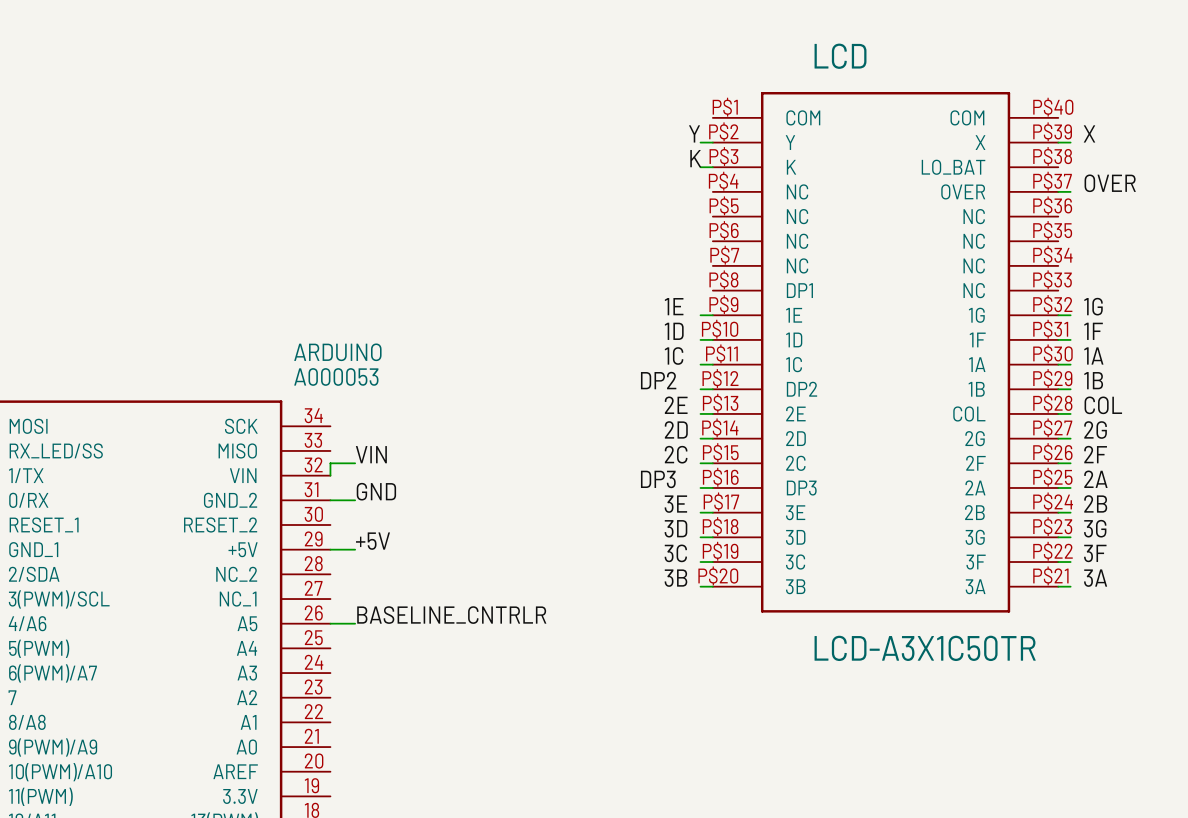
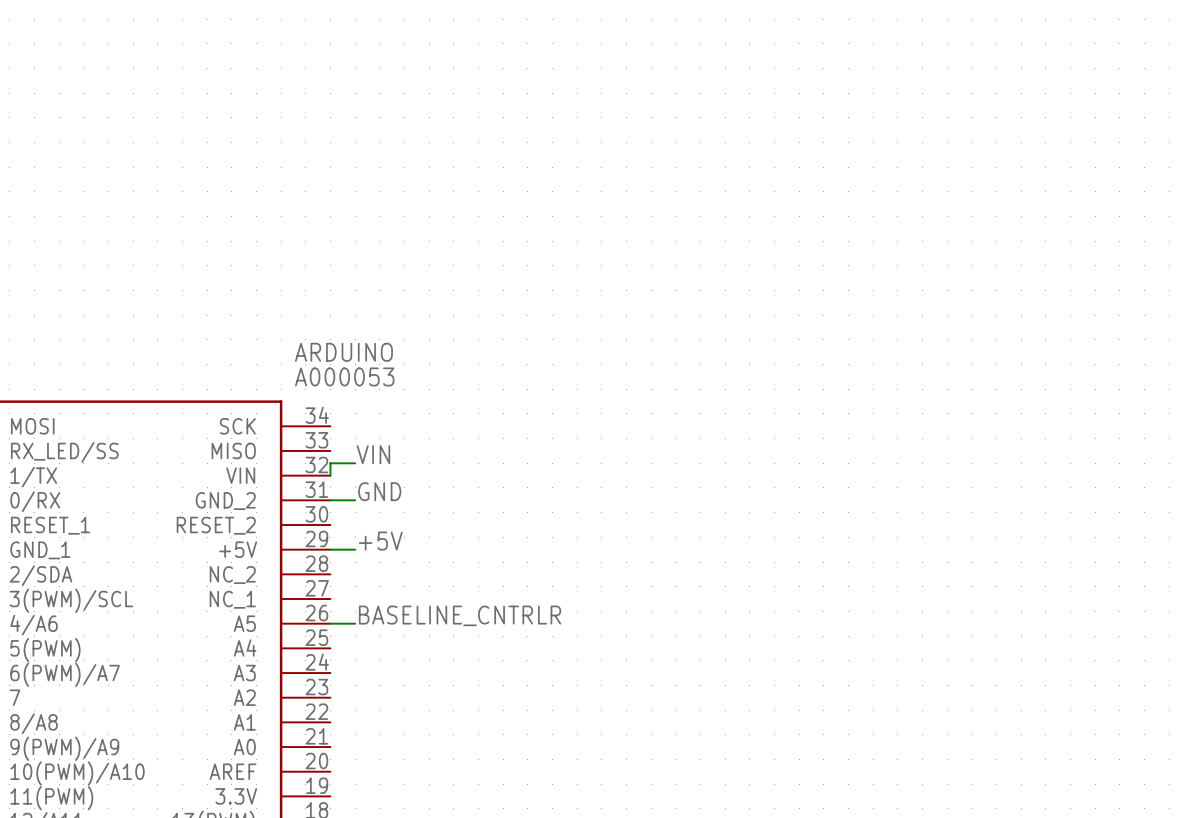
label: Y (694, 133) -> none
label: X (1089, 133) -> none
wire: (700, 142) (712, 142) -> none
wire: (1058, 142) (1070, 142) -> none
label: K (695, 158) -> none
wire: (700, 167) (712, 167) -> none
label: OVER (1110, 183) -> none
wire: (1058, 191) (1070, 191) -> none
label: 1E (674, 306) -> none
label: 1G (1093, 306) -> none
wire: (700, 315) (712, 315) -> none
wire: (1058, 315) (1070, 315) -> none
label: 1D (674, 331) -> none
label: 1F (1093, 331) -> none
wire: (700, 339) (712, 339) -> none
wire: (1058, 339) (1070, 339) -> none
LCD: LCD-A3X1C50TR (885, 352) -> none
label: 1A (1093, 355) -> none
label: 1C (674, 356) -> none
wire: (700, 364) (712, 364) -> none
wire: (1058, 364) (1070, 364) -> none
label: DP2 (658, 380) -> none
label: 1B (1093, 380) -> none
wire: (700, 389) (712, 389) -> none
wire: (1058, 389) (1070, 389) -> none
label: 2E (676, 405) -> none
label: COL (1103, 405) -> none
wire: (700, 413) (712, 413) -> none
wire: (1058, 413) (1070, 413) -> none
label: 2D (676, 429) -> none
label: 2G (1095, 430) -> none
wire: (700, 438) (712, 438) -> none
wire: (1058, 438) (1070, 438) -> none
label: 2C (676, 454) -> none
label: 2F (1095, 454) -> none
wire: (700, 463) (712, 463) -> none
wire: (1058, 463) (1070, 463) -> none
label: DP3 (658, 479) -> none
label: 2A (1095, 479) -> none
wire: (700, 487) (712, 487) -> none
wire: (1058, 487) (1070, 487) -> none
label: 2B (1095, 503) -> none
label: 3E (675, 504) -> none
wire: (700, 512) (712, 512) -> none
wire: (1058, 512) (1070, 512) -> none
label: 3D (675, 528) -> none
label: 3G (1095, 528) -> none
wire: (700, 537) (712, 537) -> none
wire: (1058, 537) (1070, 537) -> none
label: 3C (675, 553) -> none
label: 3F (1095, 553) -> none
wire: (700, 562) (712, 562) -> none
wire: (1058, 562) (1070, 562) -> none
label: 3B (675, 578) -> none
label: 3A (1095, 578) -> none
wire: (700, 586) (712, 586) -> none
wire: (1058, 586) (1070, 586) -> none

